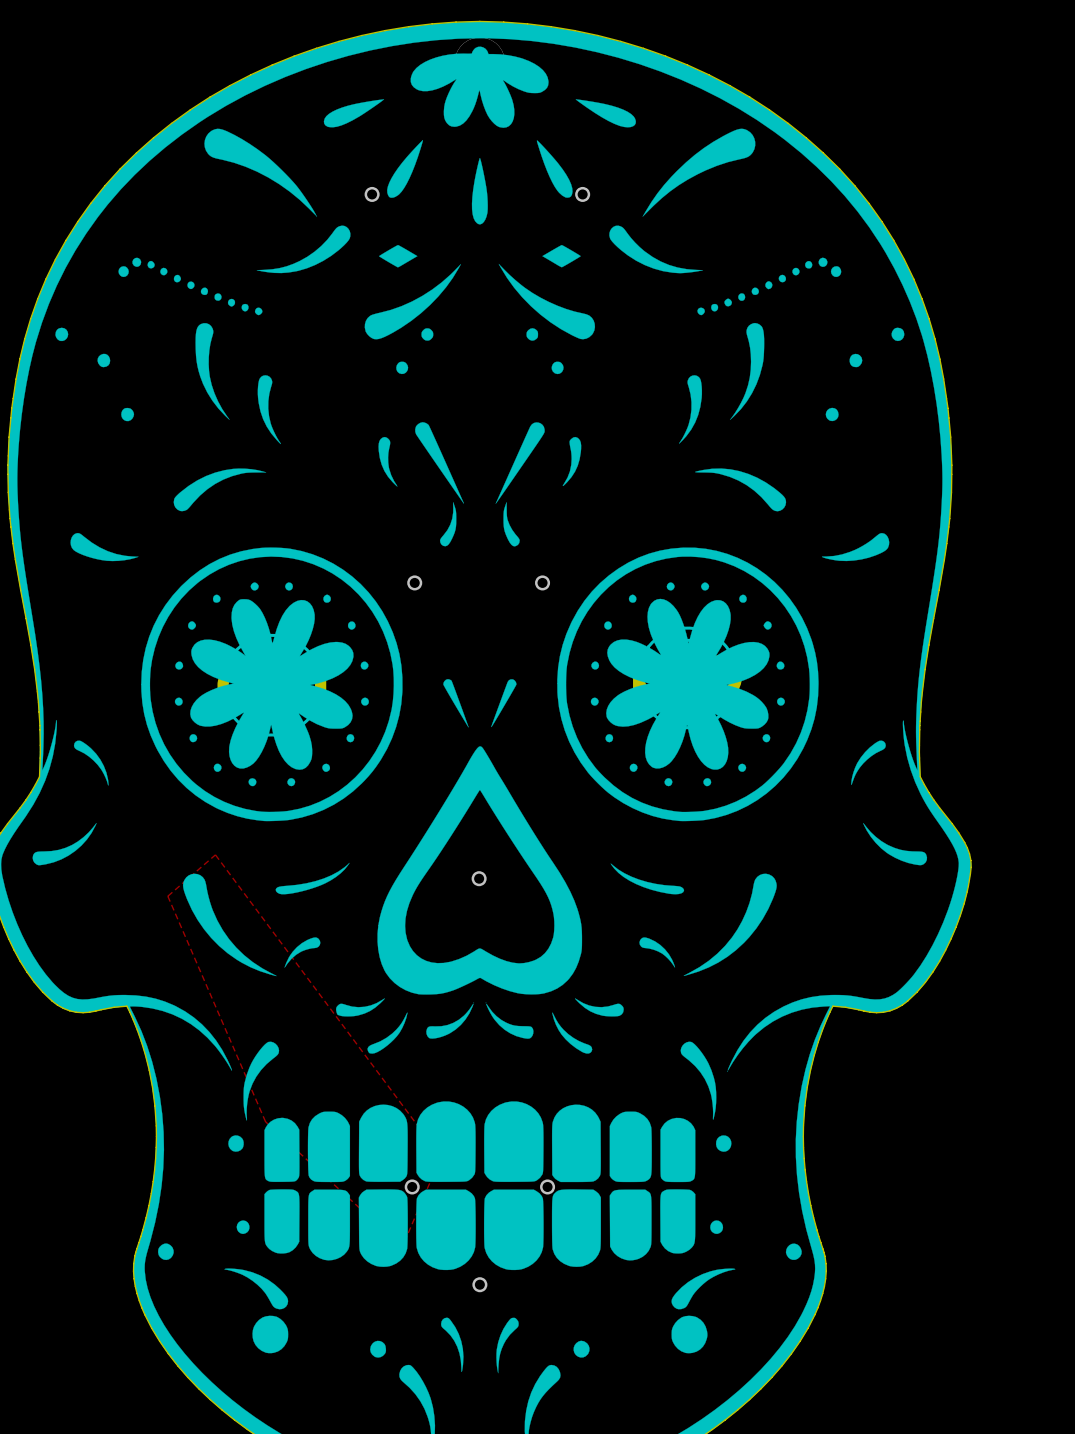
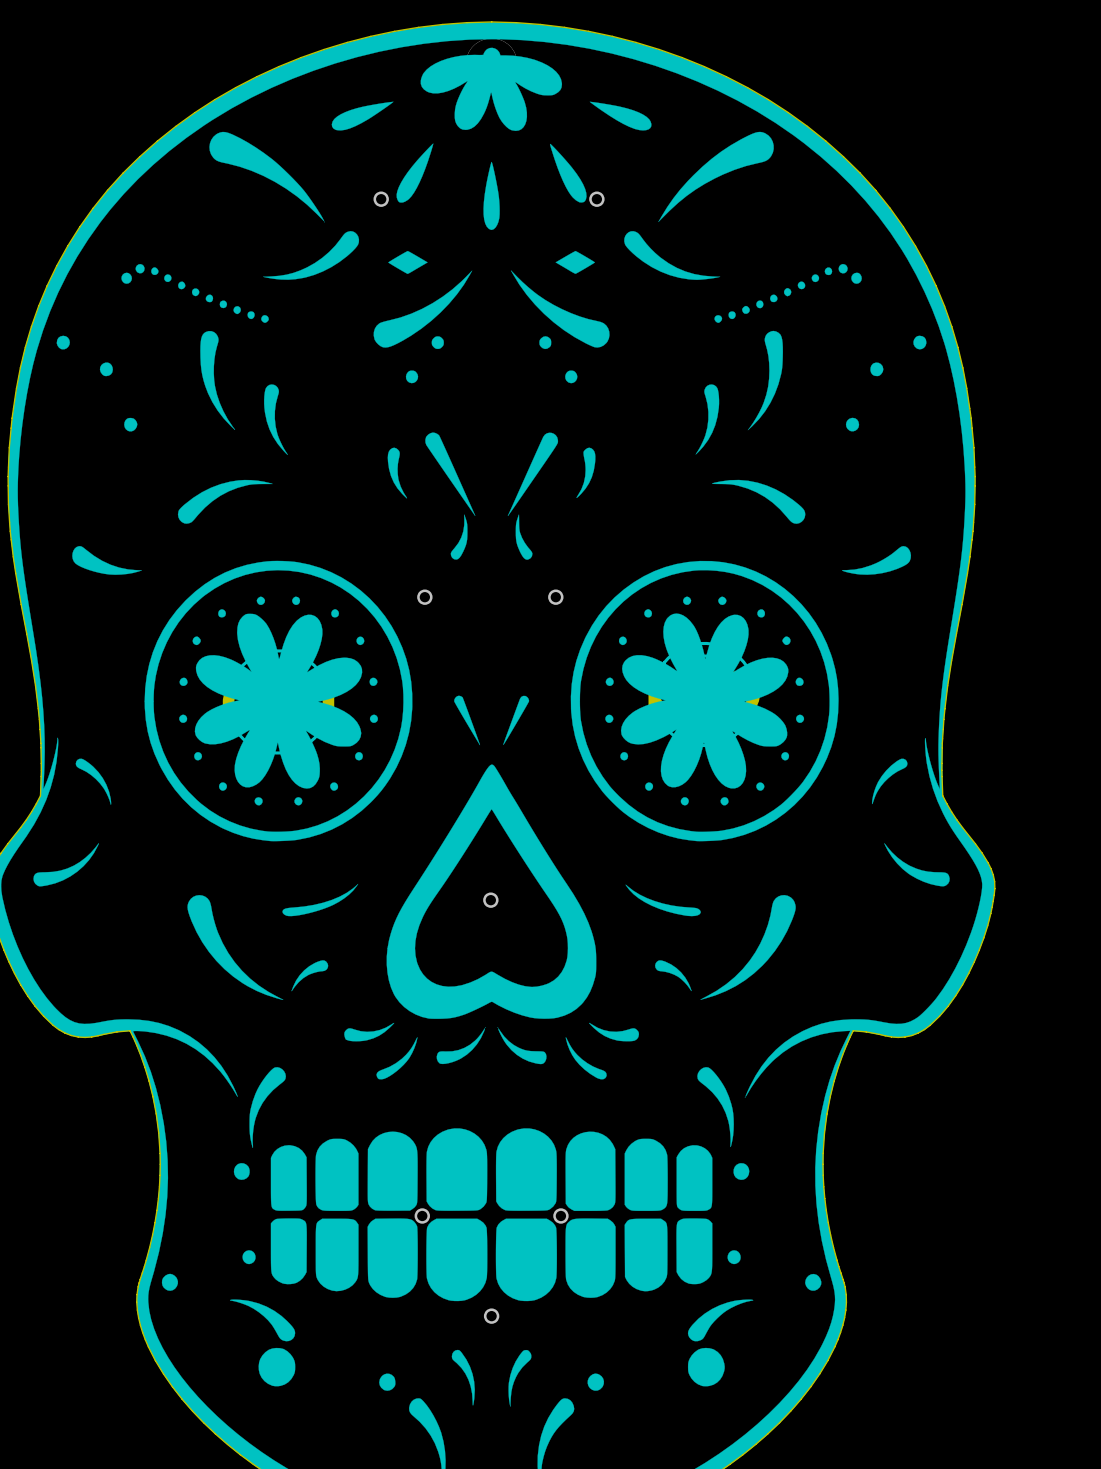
zone outline: (215, 854) (441, 1156) (402, 1247) (265, 1121) (167, 896) (215, 854) -> none

